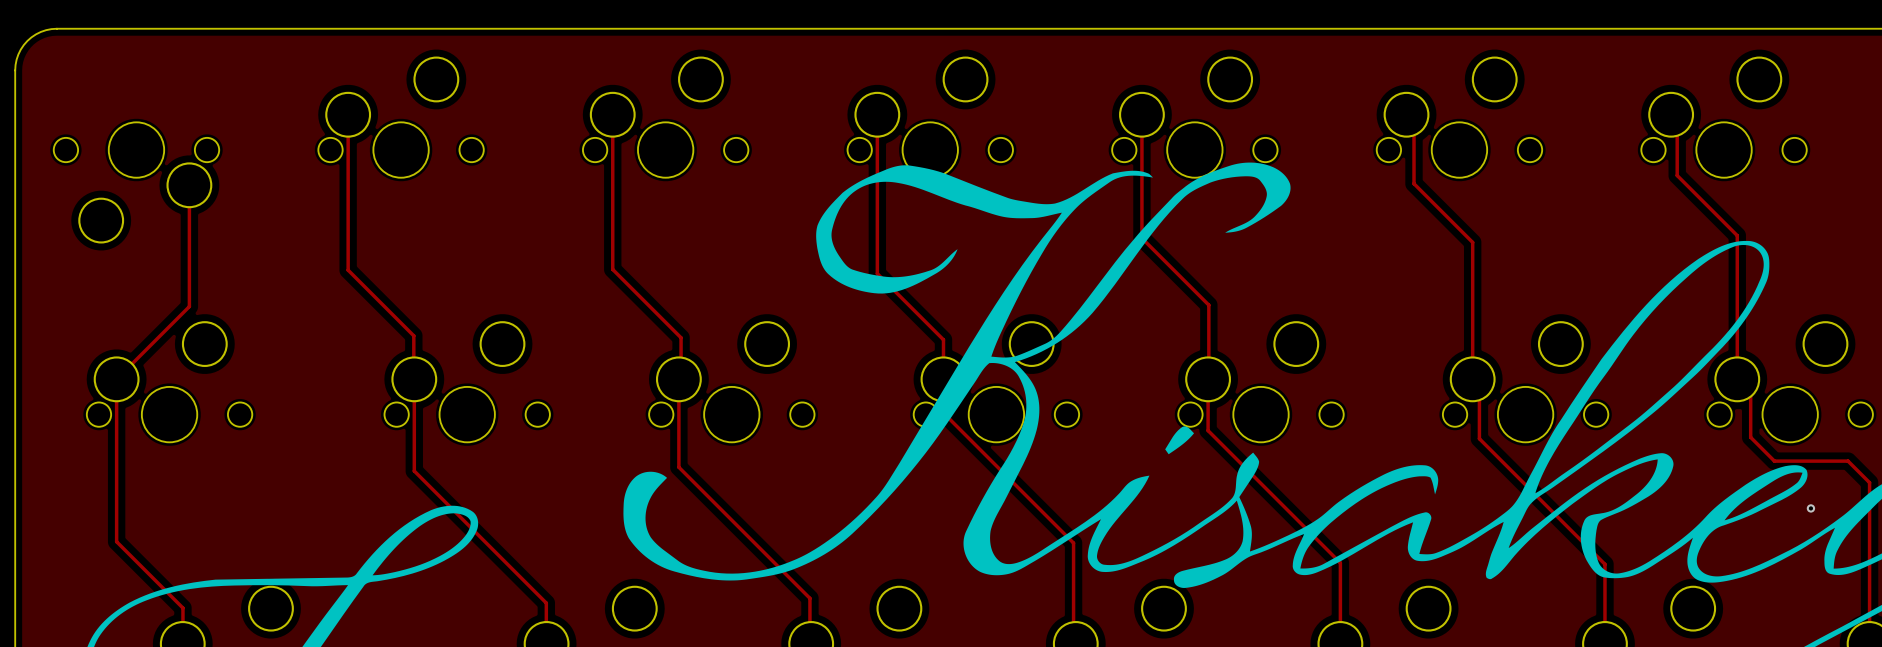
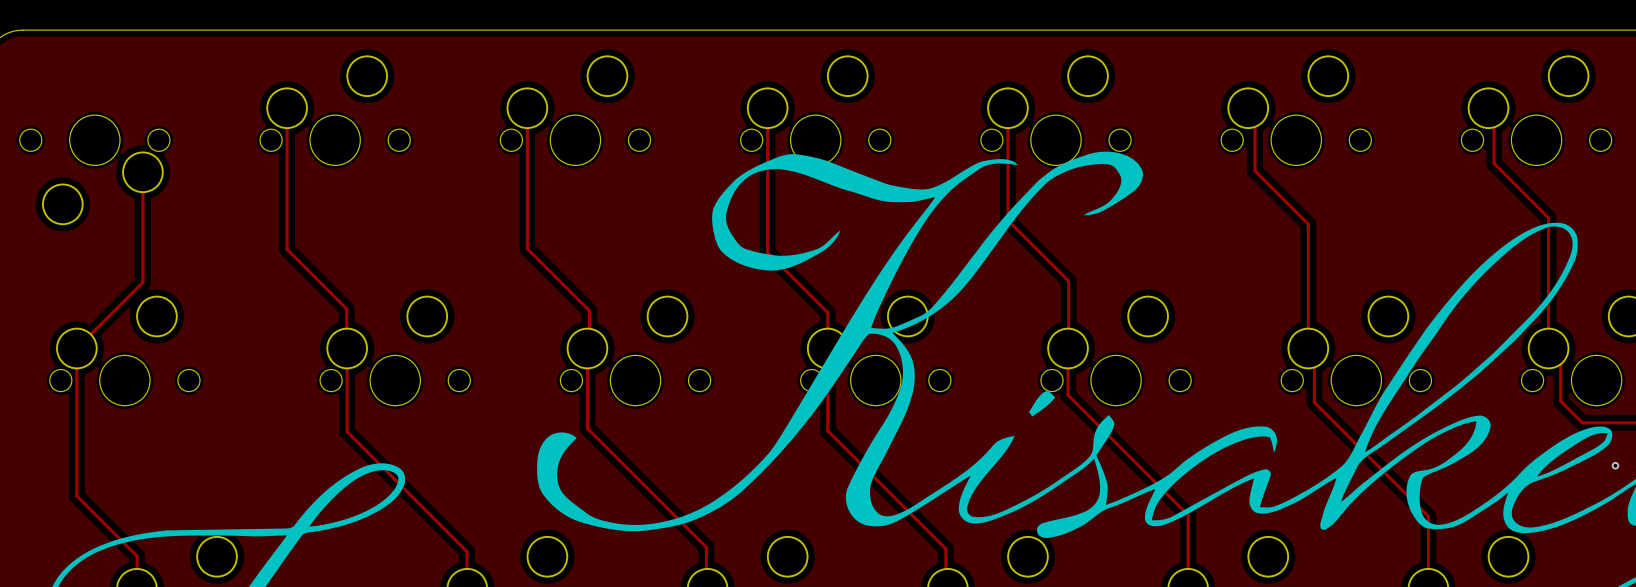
track: (943, 412) (1073, 543) (1073, 600) -> (827, 379) (827, 430) (945, 548)

